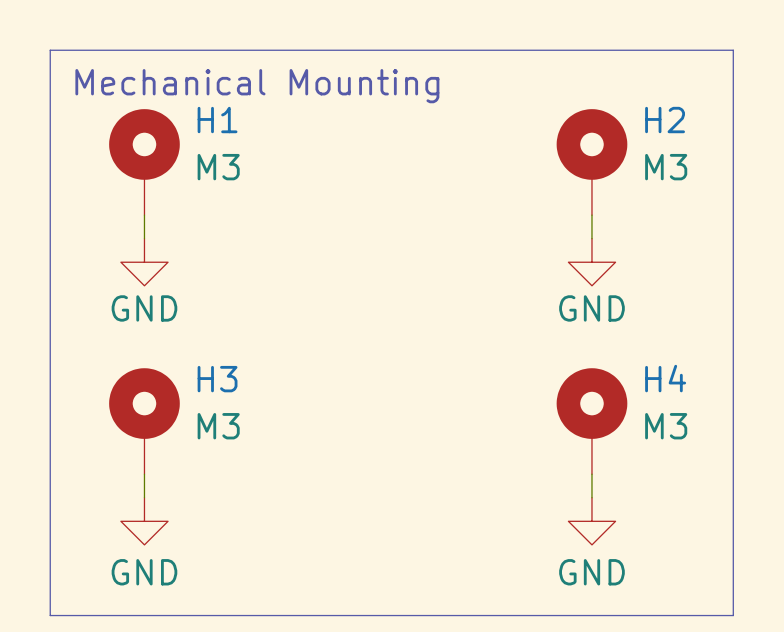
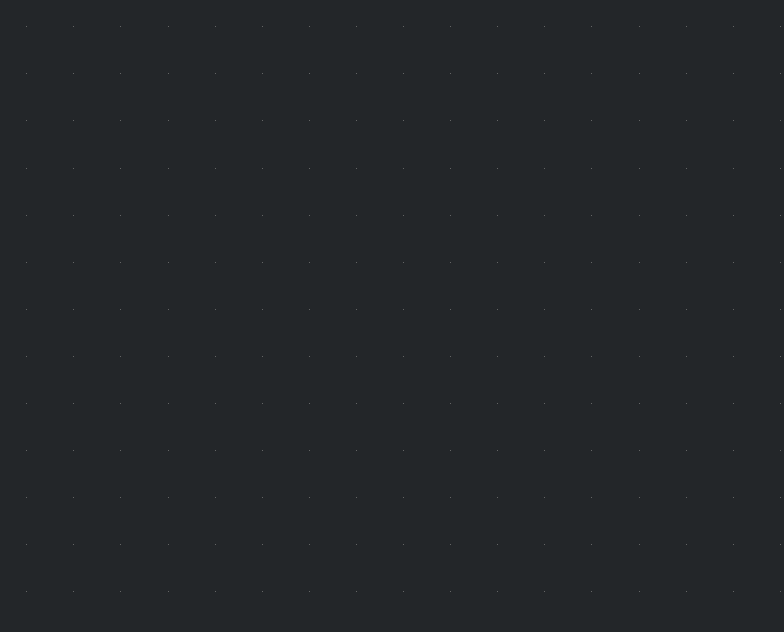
line: (50, 50) (733, 50) (733, 615) (50, 615) (50, 50) -> none
text: Mechanical Mounting (257, 86) -> none
H1: M3 (144, 162) -> none
H2: M3 (591, 162) -> none
wire: (144, 215) (144, 238) -> none
wire: (591, 215) (591, 238) -> none
power symbol: GND (144, 262) -> none
power symbol: GND (591, 262) -> none
H3: M3 (144, 421) -> none
H4: M3 (591, 421) -> none
wire: (144, 474) (144, 497) -> none
wire: (591, 474) (591, 497) -> none
power symbol: GND (144, 521) -> none
power symbol: GND (591, 521) -> none

